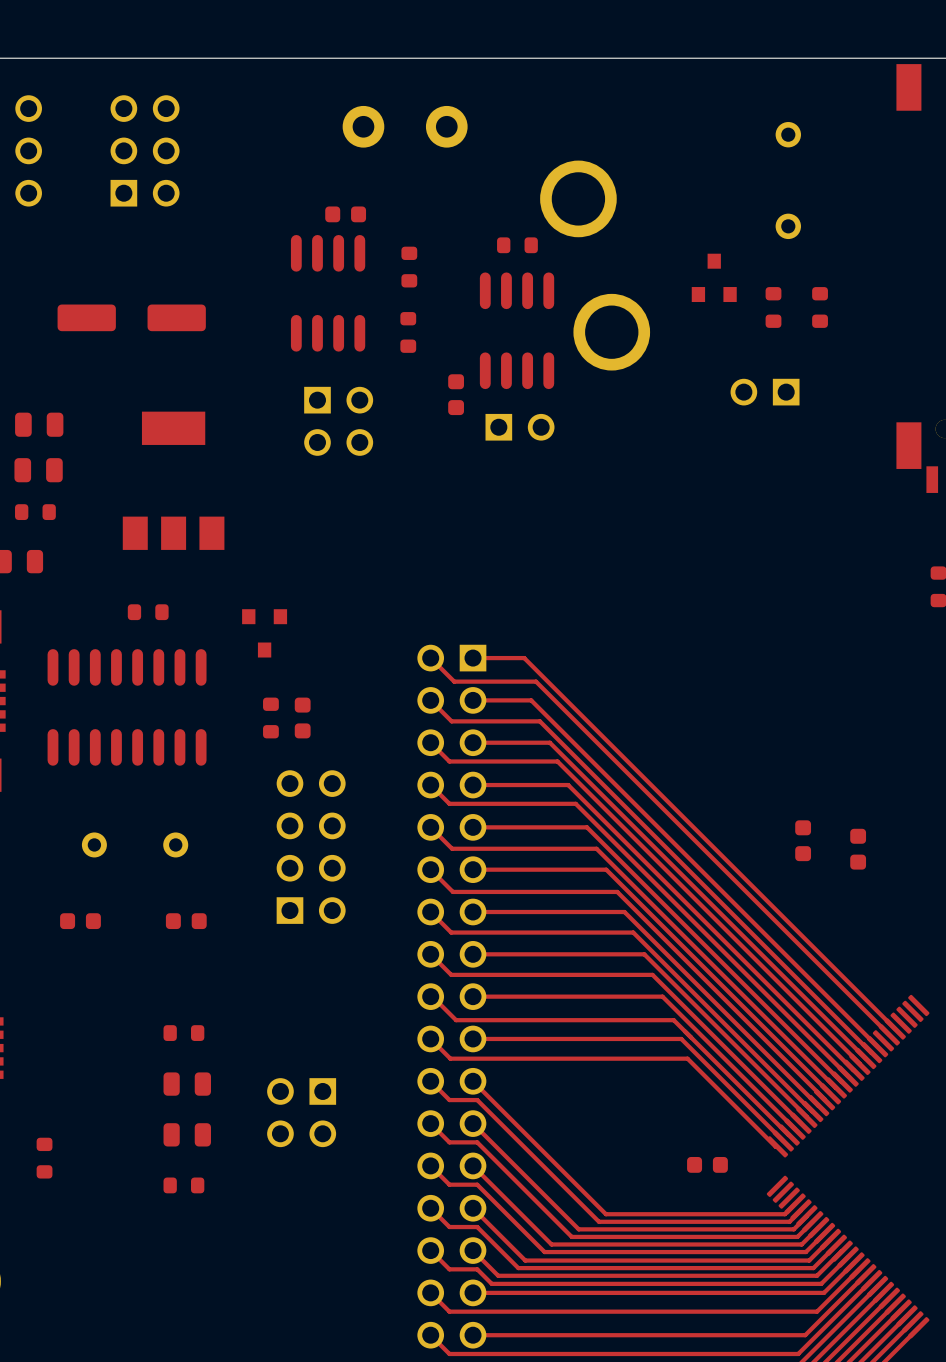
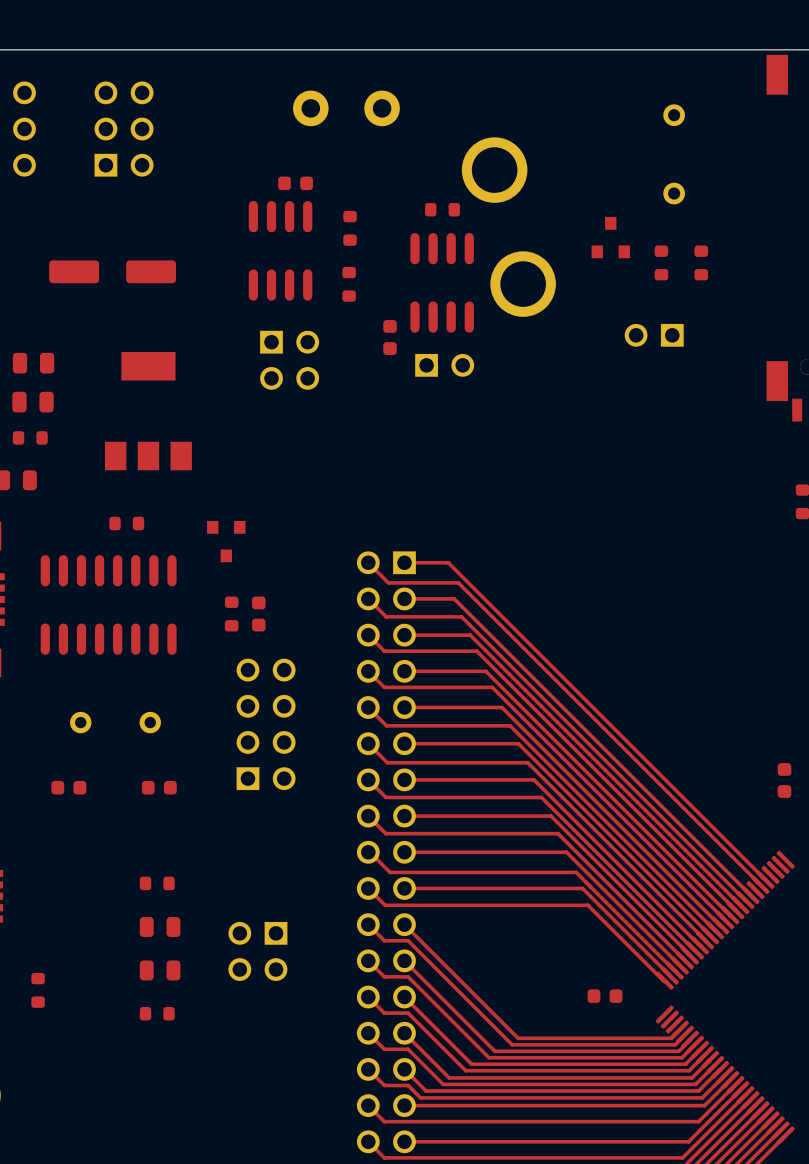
part: (803, 840) -> none
part: (858, 849) -> none
part: none -> (784, 780)

